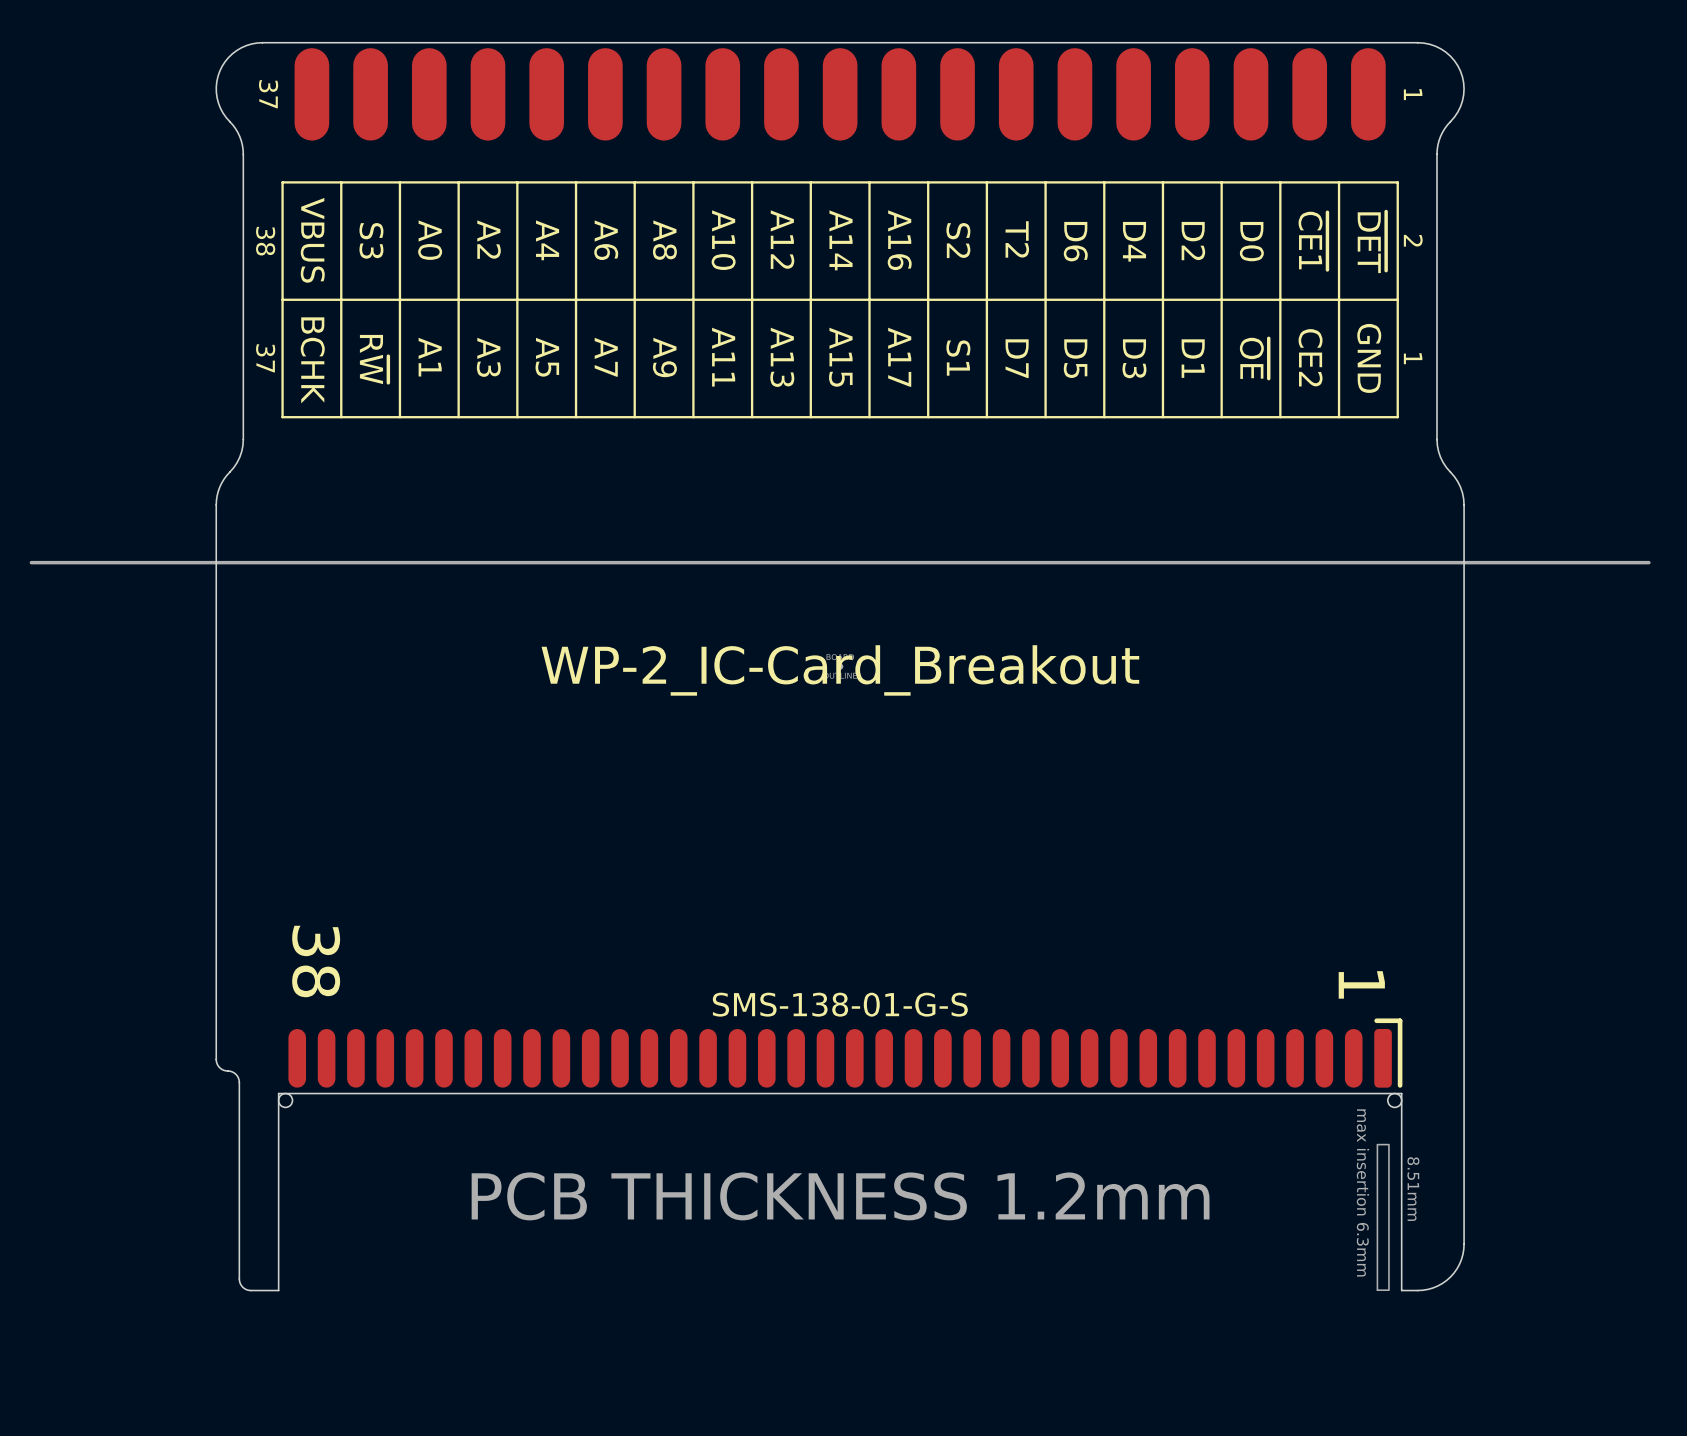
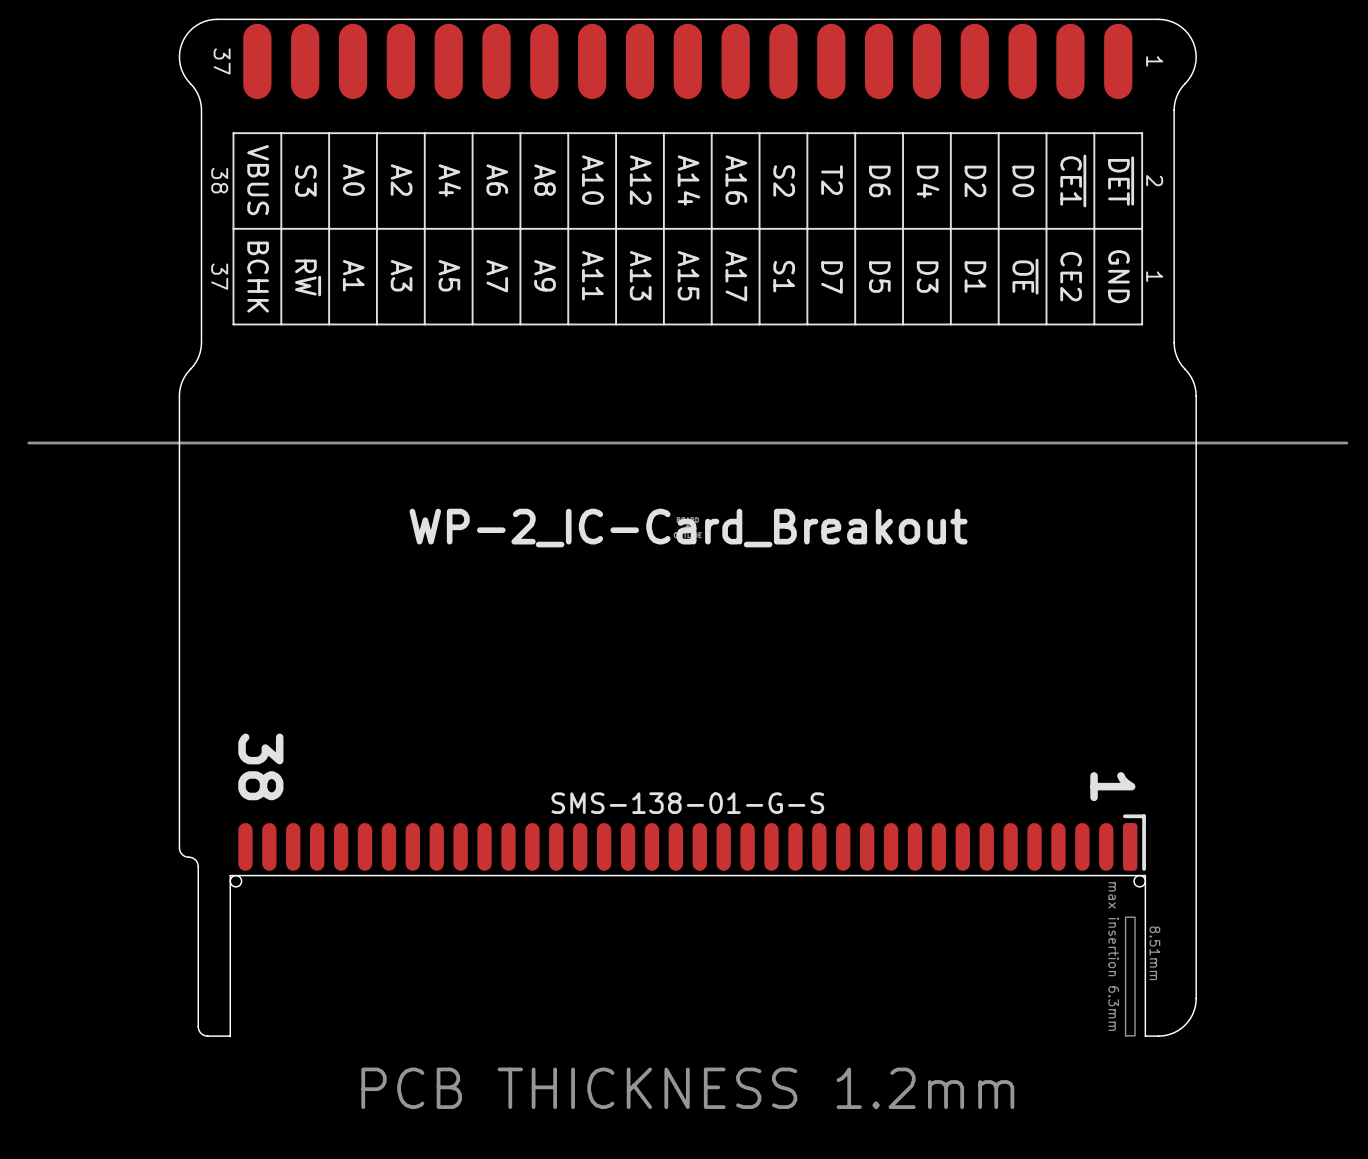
text position: PCB THICKNESS 1.2mm (840, 1196) -> PCB THICKNESS 1.2mm (687, 1088)

